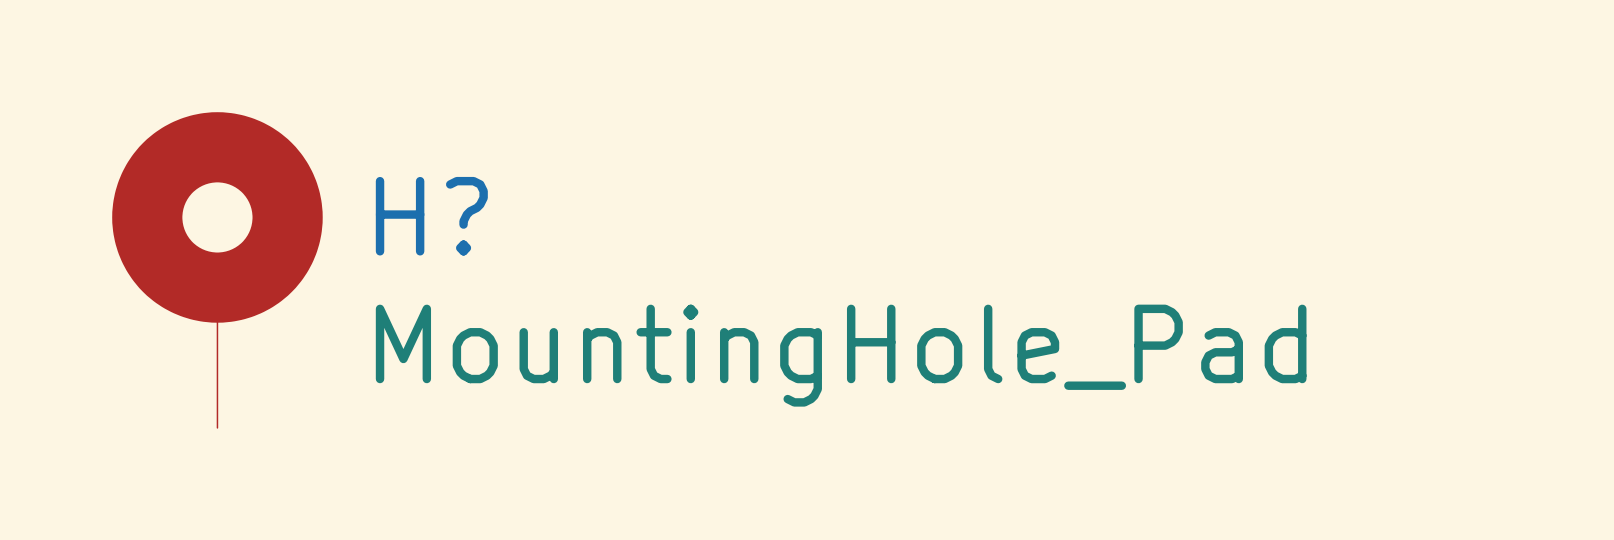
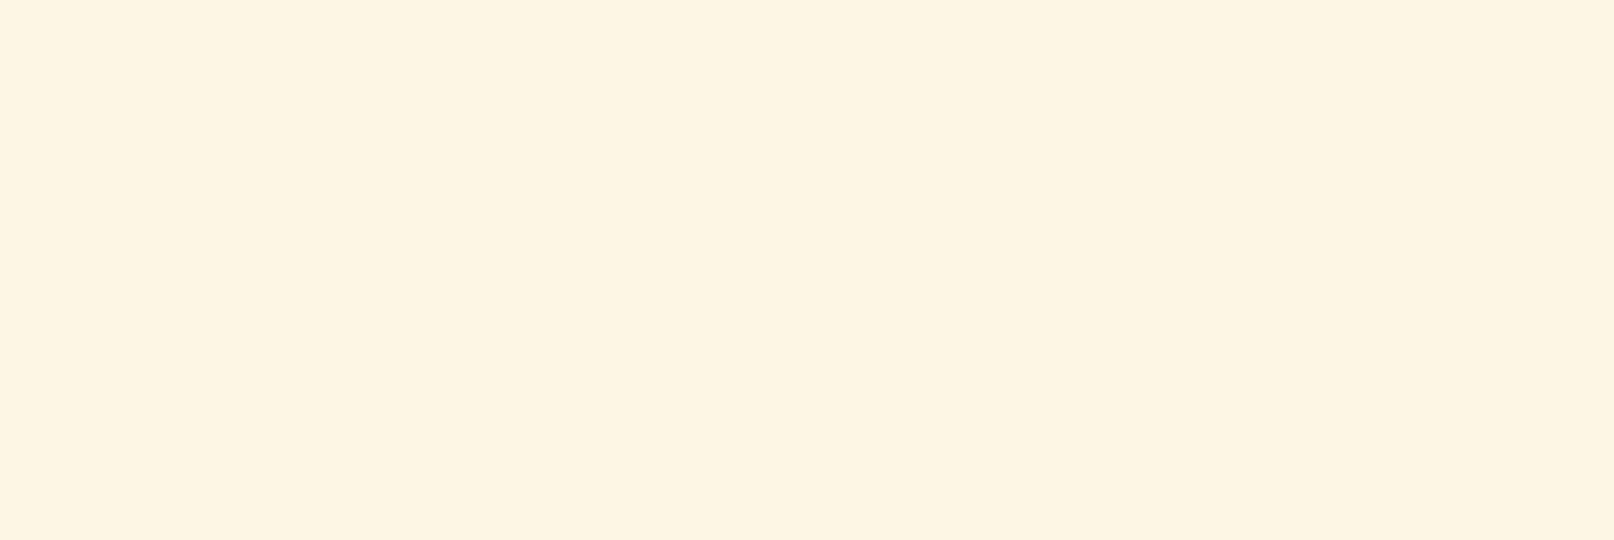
H?: MountingHole_Pad (217, 270) -> none

